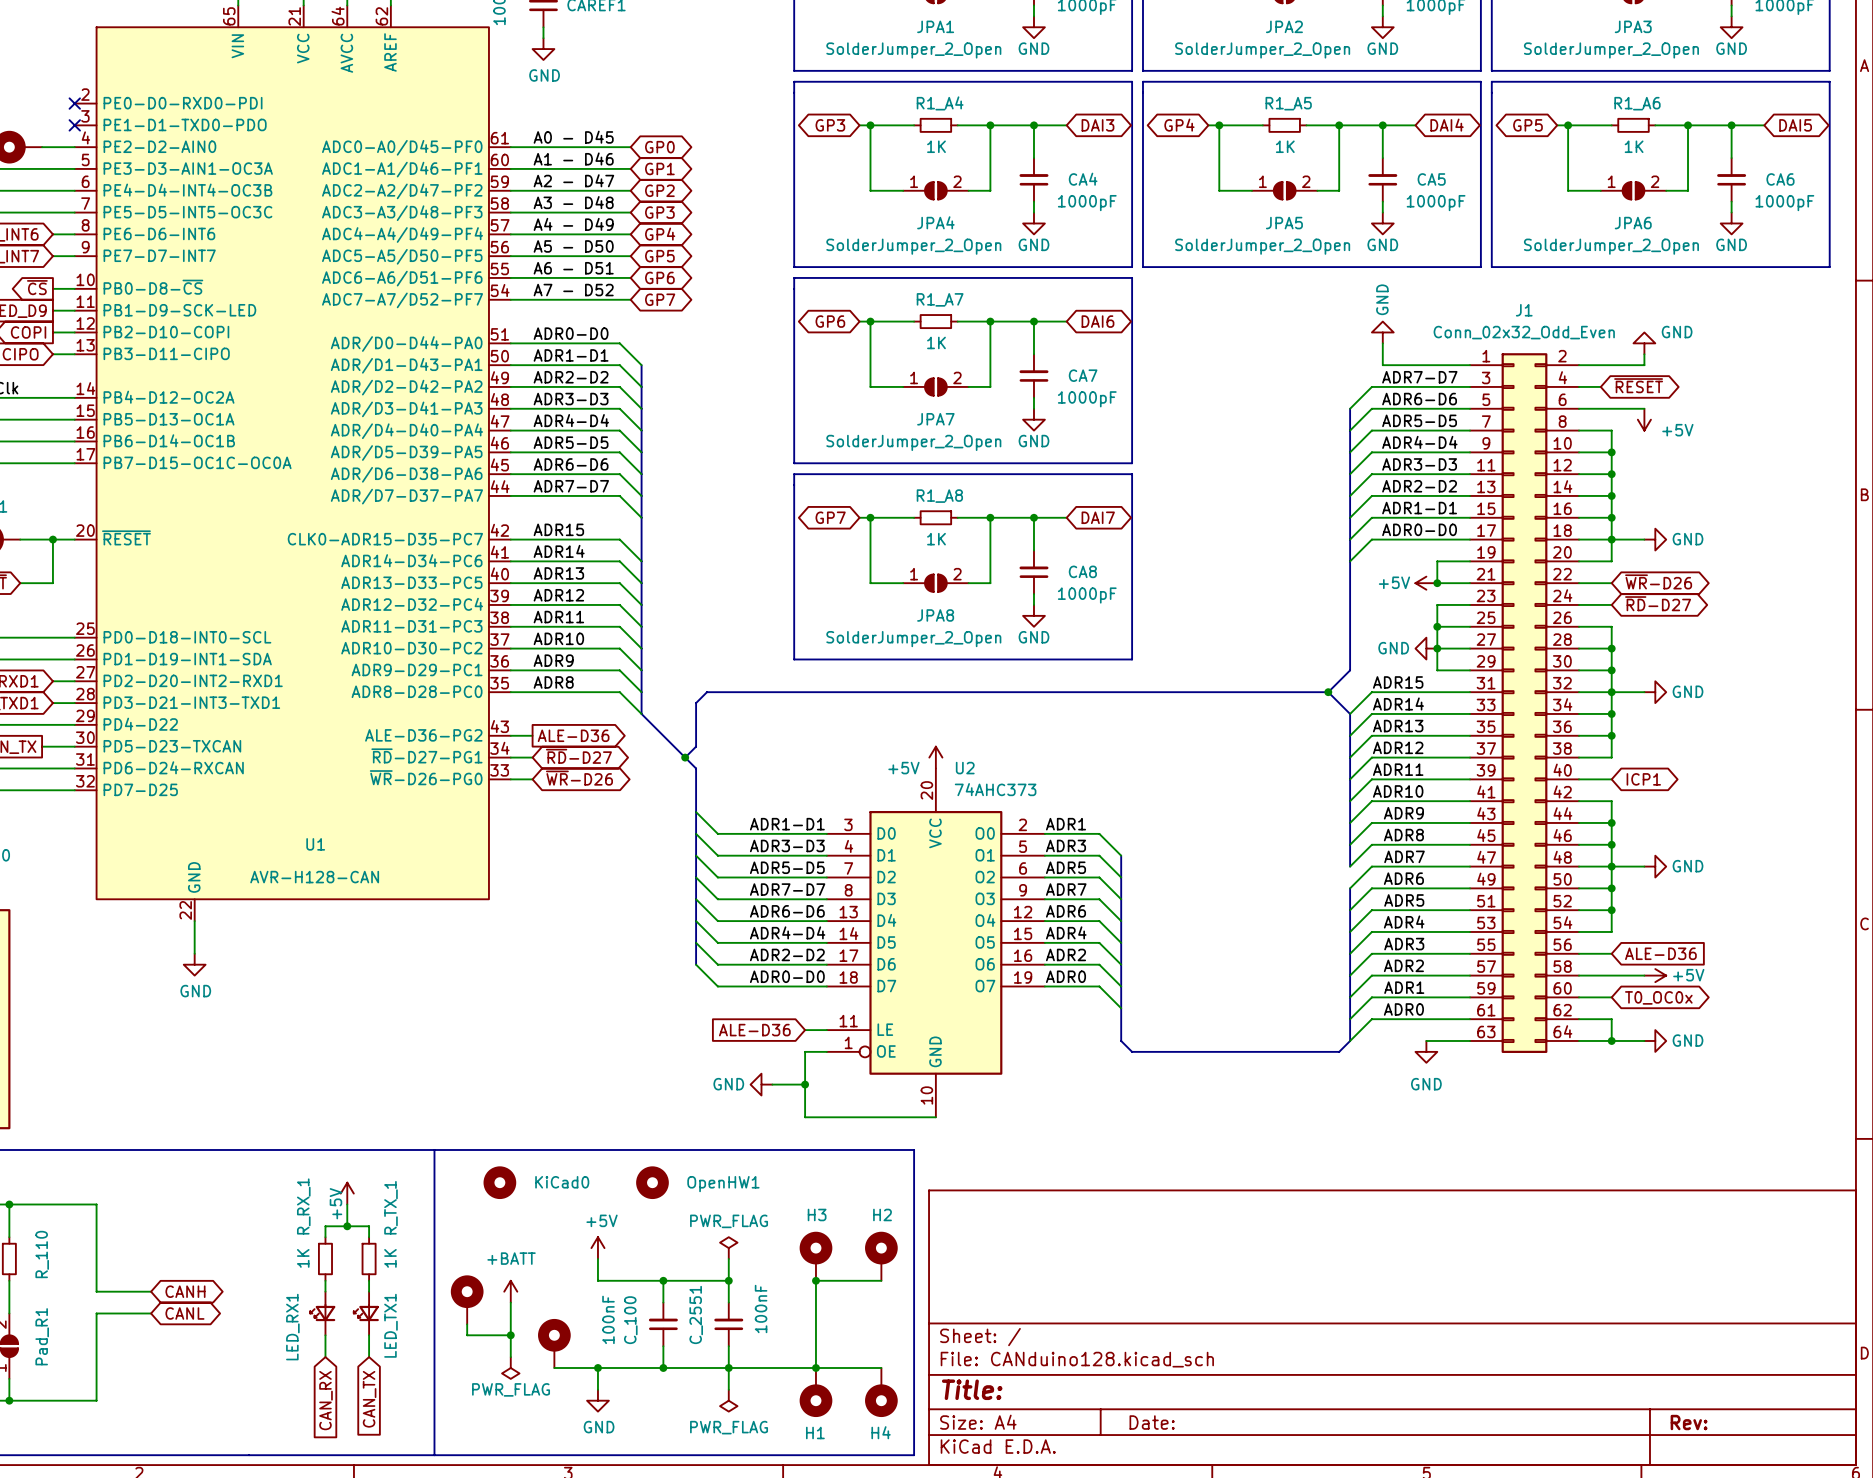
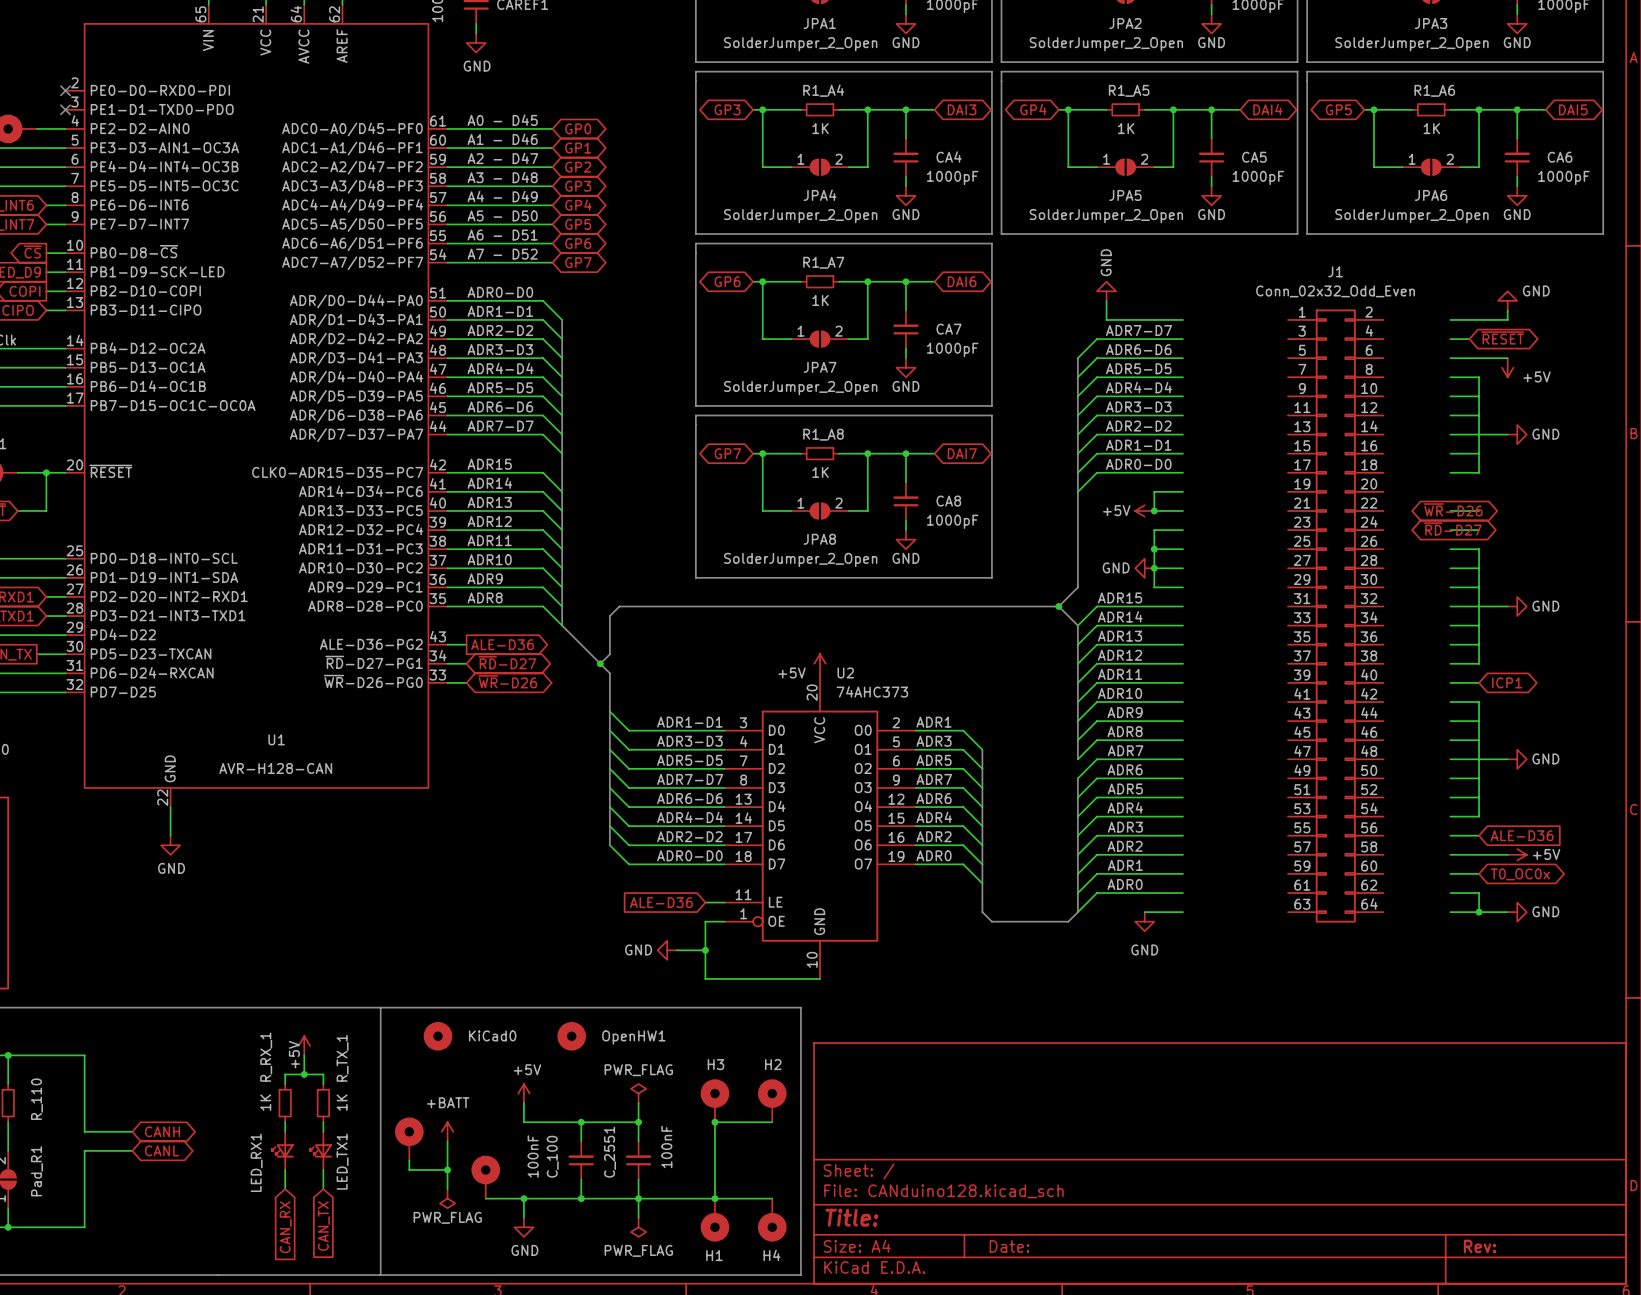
power symbol position: GND (1382, 332) -> GND (1106, 291)
wire: (1382, 343) (1382, 365) (1470, 365) -> (1106, 300) (1106, 319) (1182, 319)
power symbol position: GND (1644, 343) -> GND (1507, 300)
wire: (1644, 354) (1644, 365) (1579, 365) -> (1507, 310) (1507, 319) (1450, 319)
label position: ADR7-D7 (1419, 377) -> ADR7-D7 (1139, 330)
global label position: ~{RESET} (1638, 385) -> ~{RESET} (1502, 337)
wire: none -> (1182, 339) (1097, 339) (1077, 358)
wire: (1470, 386) (1371, 386) (1350, 408) -> (1077, 377) (1097, 358) (1182, 358)
wire: (1579, 386) (1600, 386) -> (1450, 339) (1469, 339)
label position: ADR6-D6 (1419, 399) -> ADR6-D6 (1138, 349)
bus: none -> (1077, 358) (1077, 587) (1058, 606) (1077, 625) (1077, 759)
bus: (1350, 408) (1350, 670) (1328, 692) -> none
wire: (1470, 408) (1371, 408) (1350, 430) -> (1077, 396) (1097, 377) (1182, 377)
wire: (1579, 408) (1644, 408) -> (1450, 358) (1507, 358)
power symbol position: +5V (1644, 419) -> +5V (1507, 367)
label position: ADR5-D5 (1419, 420) -> ADR5-D5 (1138, 368)
wire: (1470, 430) (1371, 430) (1350, 452) -> (1077, 415) (1097, 396) (1182, 396)
wire: (1579, 430) (1611, 430) (1611, 561) (1579, 561) -> none
wire: none -> (1450, 377) (1479, 377) (1479, 472) (1450, 472)
label position: ADR4-D4 (1419, 442) -> ADR4-D4 (1139, 387)
wire: (1470, 452) (1371, 452) (1350, 474) -> (1077, 434) (1097, 415) (1182, 415)
wire: (1579, 452) (1611, 452) -> (1450, 396) (1479, 396)
junction: (1611, 452) -> none
label position: ADR3-D3 (1419, 464) -> ADR3-D3 (1138, 406)
wire: (1470, 474) (1371, 474) (1350, 495) -> (1077, 453) (1097, 434) (1182, 434)
wire: (1579, 474) (1611, 474) -> (1450, 415) (1479, 415)
junction: (1611, 474) -> none
label position: ADR2-D2 (1419, 486) -> ADR2-D2 (1138, 426)
wire: (1470, 495) (1371, 495) (1350, 517) -> (1077, 472) (1097, 453) (1182, 453)
wire: (1579, 495) (1611, 495) -> none
junction: (1611, 495) -> none
power symbol: none -> GND (1517, 434)
label position: ADR1-D1 (1419, 508) -> ADR1-D1 (1138, 445)
wire: (1470, 517) (1371, 517) (1350, 539) -> (1077, 491) (1097, 472) (1182, 472)
wire: (1579, 517) (1611, 517) -> (1450, 453) (1479, 453)
junction: (1611, 517) -> none
label position: ADR0-D0 (1419, 529) -> ADR0-D0 (1138, 464)
wire: (1470, 539) (1371, 539) (1350, 561) -> (1182, 510) (1154, 510) (1154, 491) (1182, 491)
wire: (1579, 539) (1644, 539) -> (1450, 434) (1507, 434)
junction: (1611, 539) -> none
power symbol: GND (1655, 539) -> none
wire: (1470, 561) (1437, 561) (1437, 583) (1470, 583) -> none
junction: none -> (1154, 510)
power symbol position: +5V (1426, 583) -> +5V (1144, 510)
junction: (1437, 583) -> none
wire: (1579, 583) (1611, 583) -> (1450, 510) (1479, 510)
wire: (1470, 604) (1437, 604) (1437, 670) (1470, 670) -> (1182, 530) (1154, 530) (1154, 587) (1182, 587)
wire: (1579, 604) (1611, 604) -> (1450, 530) (1479, 530)
junction: none -> (1154, 549)
wire: (1437, 626) (1470, 626) -> (1154, 549) (1182, 549)
junction: (1437, 626) -> none
wire: (1579, 626) (1611, 626) (1611, 757) (1579, 757) -> (1450, 549) (1479, 549) (1479, 663) (1450, 663)
junction: none -> (1154, 568)
power symbol position: GND (1426, 648) -> GND (1144, 568)
wire: (1437, 648) (1470, 648) -> (1154, 568) (1182, 568)
junction: (1437, 648) -> none
wire: (1579, 648) (1611, 648) -> (1450, 568) (1479, 568)
junction: (1611, 648) -> none
wire: (1579, 670) (1611, 670) -> (1450, 587) (1479, 587)
junction: (1611, 670) -> none
label position: ADR15 (1398, 682) -> ADR15 (1120, 597)
bus: (1208, 692) (1328, 692) -> none
junction: none -> (1058, 606)
bus: (1328, 692) (1350, 713) (1350, 866) -> none
junction: (1328, 692) -> none
wire: none -> (1182, 606) (1097, 606) (1077, 625)
wire: (1470, 692) (1371, 692) (1350, 713) -> (1077, 644) (1097, 625) (1182, 625)
wire: (1579, 692) (1644, 692) -> (1450, 606) (1507, 606)
junction: (1611, 692) -> none
power symbol position: GND (1655, 692) -> GND (1517, 606)
label position: ADR14 (1398, 703) -> ADR14 (1120, 616)
wire: (1470, 713) (1371, 713) (1350, 735) -> (1077, 663) (1097, 644) (1182, 644)
wire: (1579, 713) (1611, 713) -> (1450, 625) (1479, 625)
junction: (1611, 713) -> none
label position: ADR13 (1398, 726) -> ADR13 (1120, 636)
wire: (1470, 735) (1371, 735) (1350, 757) -> (1077, 682) (1097, 663) (1182, 663)
wire: (1579, 735) (1611, 735) -> (1450, 644) (1479, 644)
junction: (1611, 735) -> none
label position: ADR12 (1398, 747) -> ADR12 (1120, 655)
wire: (1470, 757) (1371, 757) (1350, 779) -> (1077, 702) (1097, 682) (1182, 682)
label position: ADR11 (1398, 769) -> ADR11 (1120, 674)
wire: (1470, 779) (1371, 779) (1350, 801) -> (1077, 721) (1097, 702) (1182, 702)
wire: (1579, 779) (1611, 779) -> (1450, 682) (1479, 682)
global label position: ICP1 (1643, 779) -> ICP1 (1507, 682)
label position: ADR10 (1398, 791) -> ADR10 (1120, 693)
wire: (1470, 801) (1371, 801) (1350, 822) -> (1077, 740) (1097, 721) (1182, 721)
wire: (1579, 801) (1611, 801) (1611, 931) (1579, 931) -> (1450, 702) (1479, 702) (1479, 816) (1450, 816)
label position: ADR9 (1403, 813) -> ADR9 (1125, 712)
wire: (1470, 822) (1371, 822) (1350, 844) -> (1077, 759) (1097, 740) (1182, 740)
wire: (1579, 822) (1611, 822) -> (1450, 721) (1479, 721)
junction: (1611, 822) -> none
label position: ADR8 (1403, 835) -> ADR8 (1125, 731)
wire: (1470, 844) (1371, 844) (1350, 866) -> (1077, 778) (1097, 759) (1182, 759)
wire: (1579, 844) (1611, 844) -> (1450, 740) (1479, 740)
junction: (1611, 844) -> none
label position: ADR7 (1404, 856) -> ADR7 (1125, 750)
wire: (1470, 866) (1371, 866) (1350, 888) -> (1077, 797) (1097, 778) (1182, 778)
wire: (1579, 866) (1644, 866) -> (1450, 759) (1507, 759)
junction: (1611, 866) -> none
power symbol position: GND (1655, 866) -> GND (1517, 759)
label position: ADR6 (1403, 878) -> ADR6 (1125, 769)
bus: (1350, 888) (1350, 1040) (1339, 1051) (1219, 1051) -> (1077, 778) (1077, 912) (1068, 921)
wire: (1470, 888) (1371, 888) (1350, 910) -> (1077, 816) (1097, 797) (1182, 797)
wire: (1579, 888) (1611, 888) -> (1450, 778) (1479, 778)
junction: (1611, 888) -> none
label position: ADR5 (1404, 900) -> ADR5 (1125, 788)
wire: (1470, 910) (1371, 910) (1350, 931) -> (1077, 835) (1097, 816) (1182, 816)
wire: (1579, 910) (1611, 910) -> (1450, 797) (1479, 797)
junction: (1611, 910) -> none
label position: ADR4 (1404, 922) -> ADR4 (1125, 807)
wire: (1470, 931) (1371, 931) (1350, 953) -> (1077, 854) (1097, 835) (1182, 835)
label position: ADR3 (1404, 944) -> ADR3 (1125, 827)
wire: (1470, 953) (1371, 953) (1350, 975) -> (1077, 873) (1097, 854) (1182, 854)
wire: (1579, 953) (1611, 953) -> (1450, 835) (1479, 835)
global label position: ALE-D36 (1660, 953) -> ALE-D36 (1522, 835)
label position: ADR2 (1403, 965) -> ADR2 (1125, 846)
wire: (1470, 975) (1371, 975) (1350, 997) -> (1077, 893) (1097, 873) (1182, 873)
wire: (1579, 975) (1644, 975) -> (1450, 854) (1507, 854)
power symbol position: +5V (1655, 975) -> +5V (1517, 854)
label position: ADR1 (1404, 987) -> ADR1 (1125, 865)
wire: (1470, 997) (1371, 997) (1350, 1019) -> (1077, 912) (1097, 893) (1182, 893)
wire: (1579, 997) (1611, 997) -> (1450, 873) (1479, 873)
global label position: T0_OC0x (1658, 997) -> T0_OC0x (1520, 874)
label position: ADR0 (1403, 1009) -> ADR0 (1125, 884)
wire: (1470, 1019) (1371, 1019) (1350, 1040) -> (1144, 912) (1182, 912)
wire: (1579, 1019) (1611, 1019) (1611, 1040) -> (1450, 893) (1479, 893) (1479, 912)
wire: (1426, 1040) (1470, 1040) -> none
wire: (1579, 1040) (1644, 1040) -> (1450, 912) (1507, 912)
junction: (1611, 1040) -> none
power symbol position: GND (1655, 1040) -> GND (1517, 912)
junction: none -> (1479, 912)
power symbol position: GND (1426, 1051) -> GND (1144, 921)

